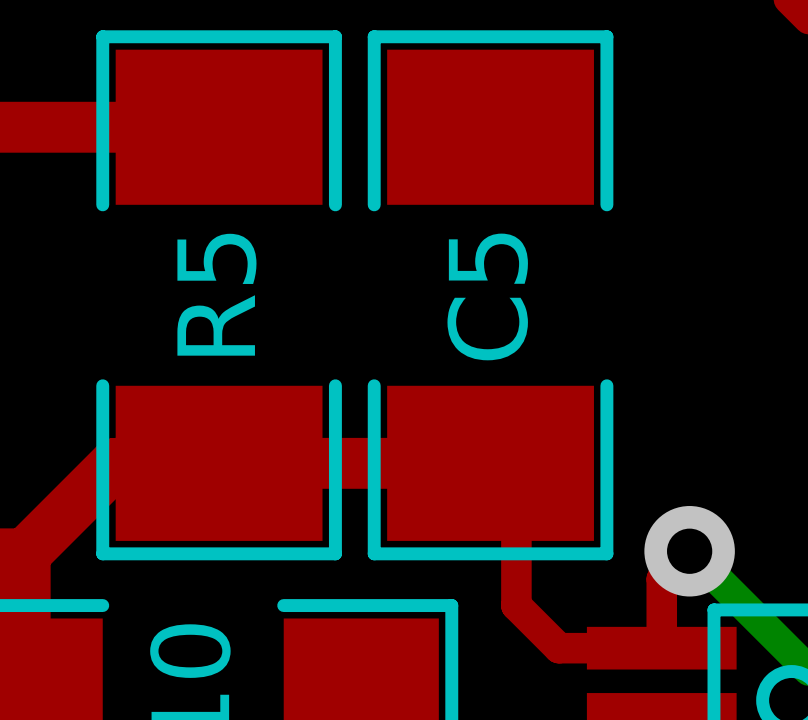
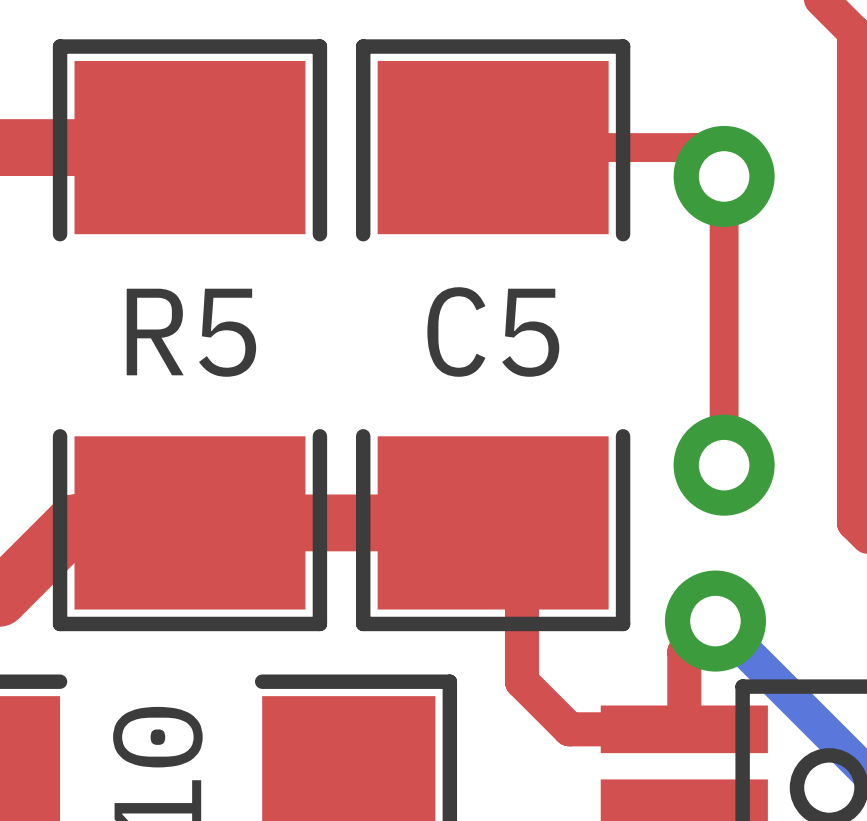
top track: none -> (493, 147) (695, 147) (724, 176) (724, 465)
via: none -> (724, 176)
R5 name rotation: 0° (216, 294) -> 90° clockwise (191, 332)
C5 name rotation: 0° (487, 296) -> 90° clockwise (493, 332)
via: none -> (724, 465)

